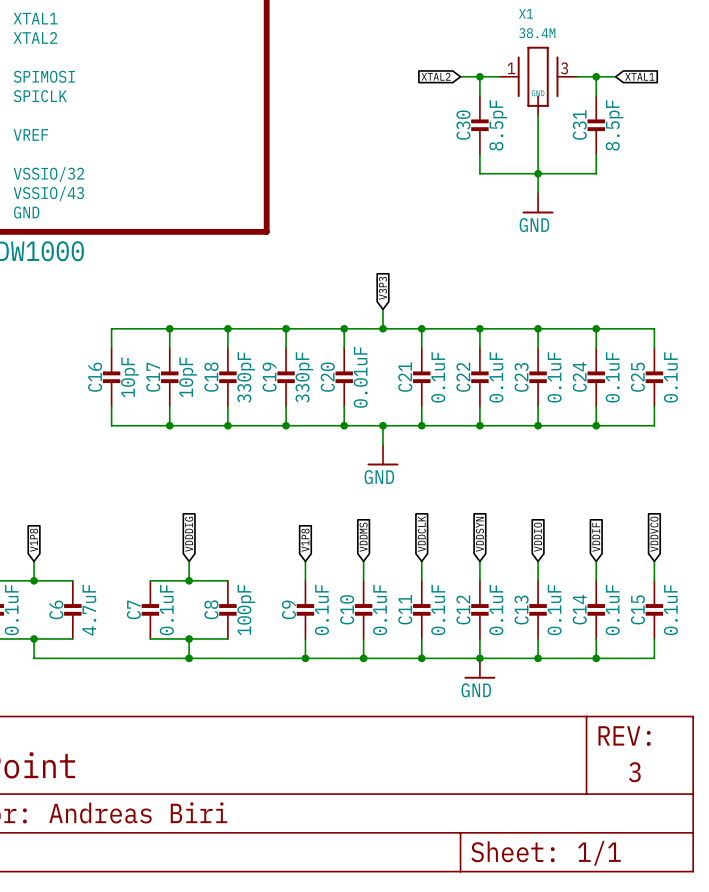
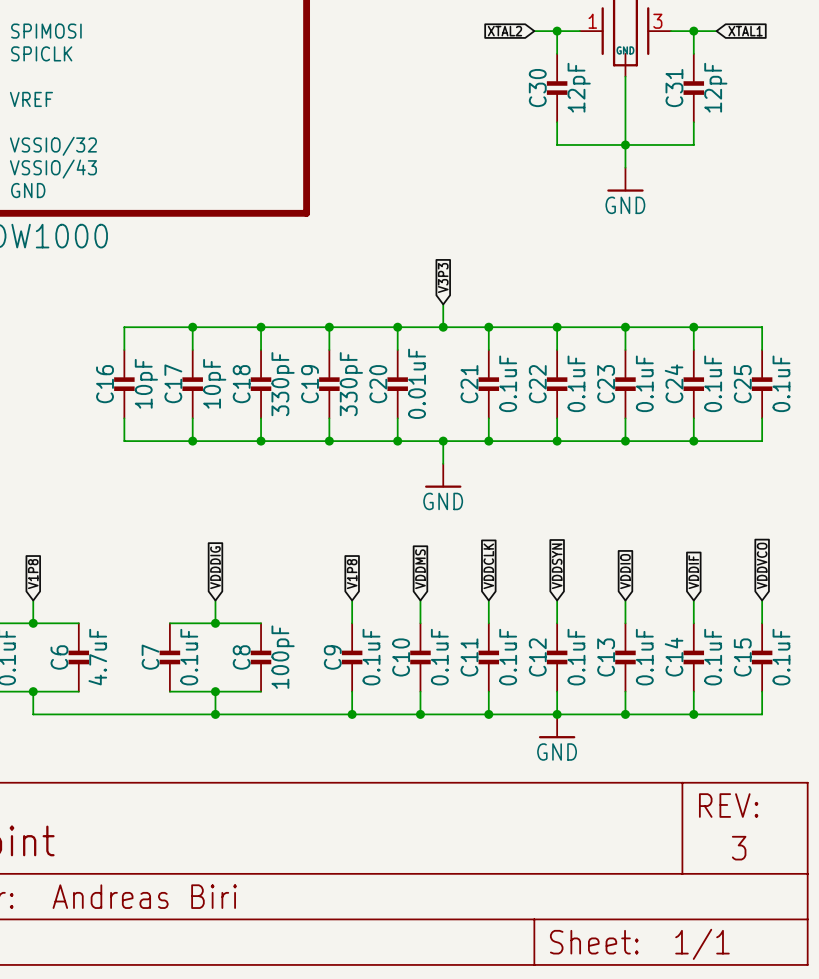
C30 value: 8.5pF (498, 125) -> 12pF (579, 87)
C31 value: 8.5pF (614, 125) -> 12pF (715, 87)

